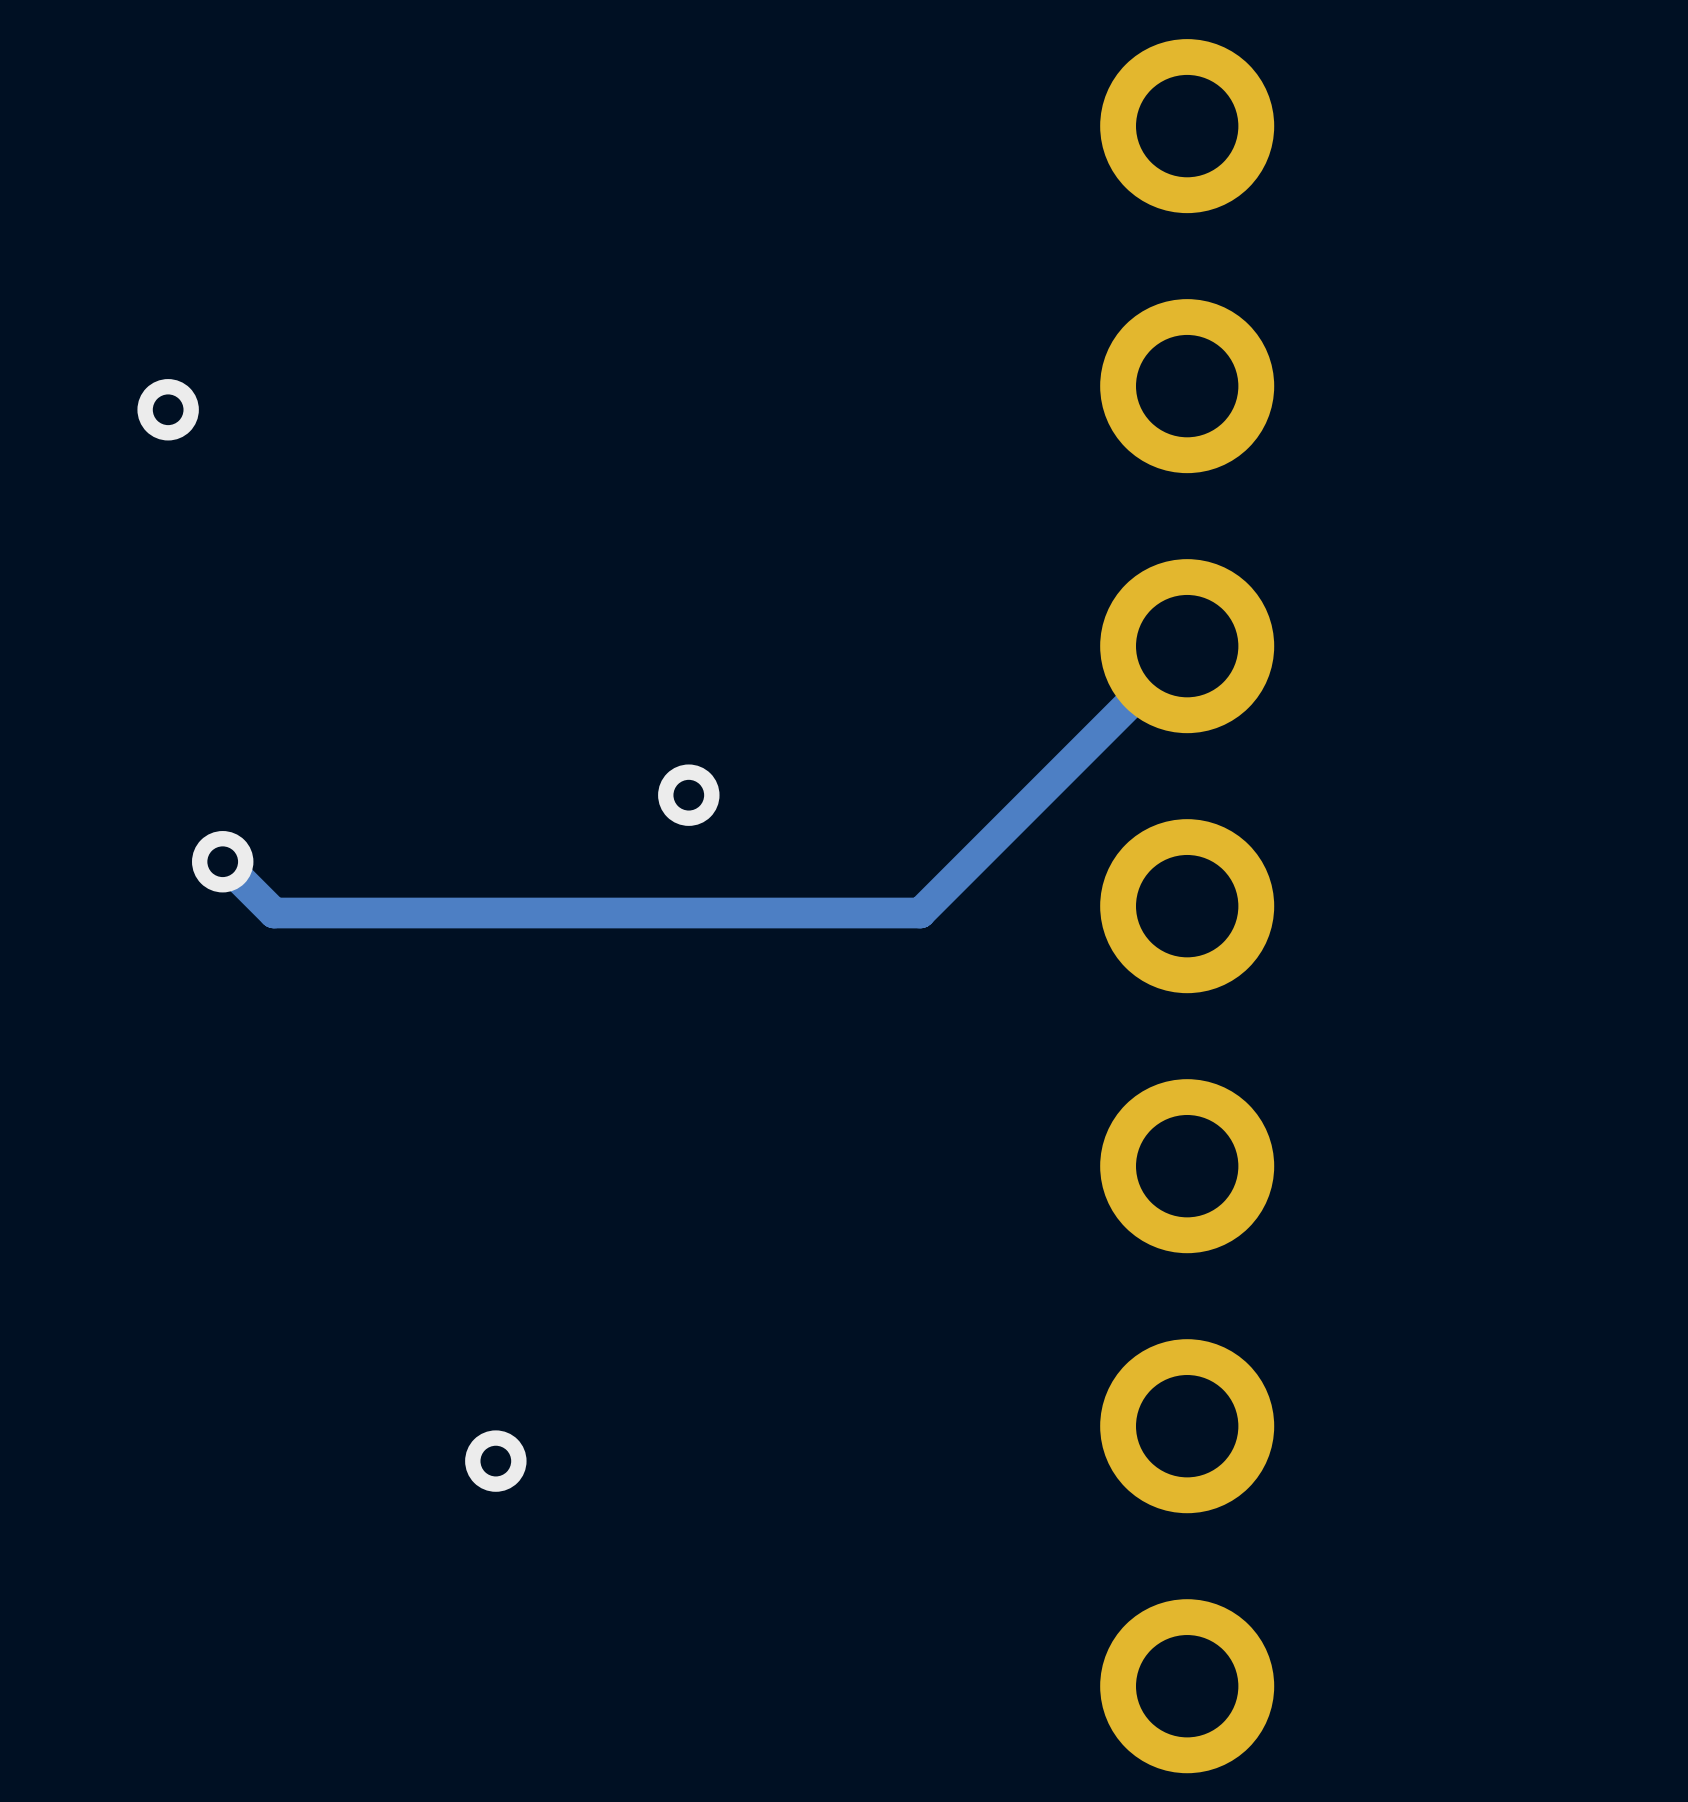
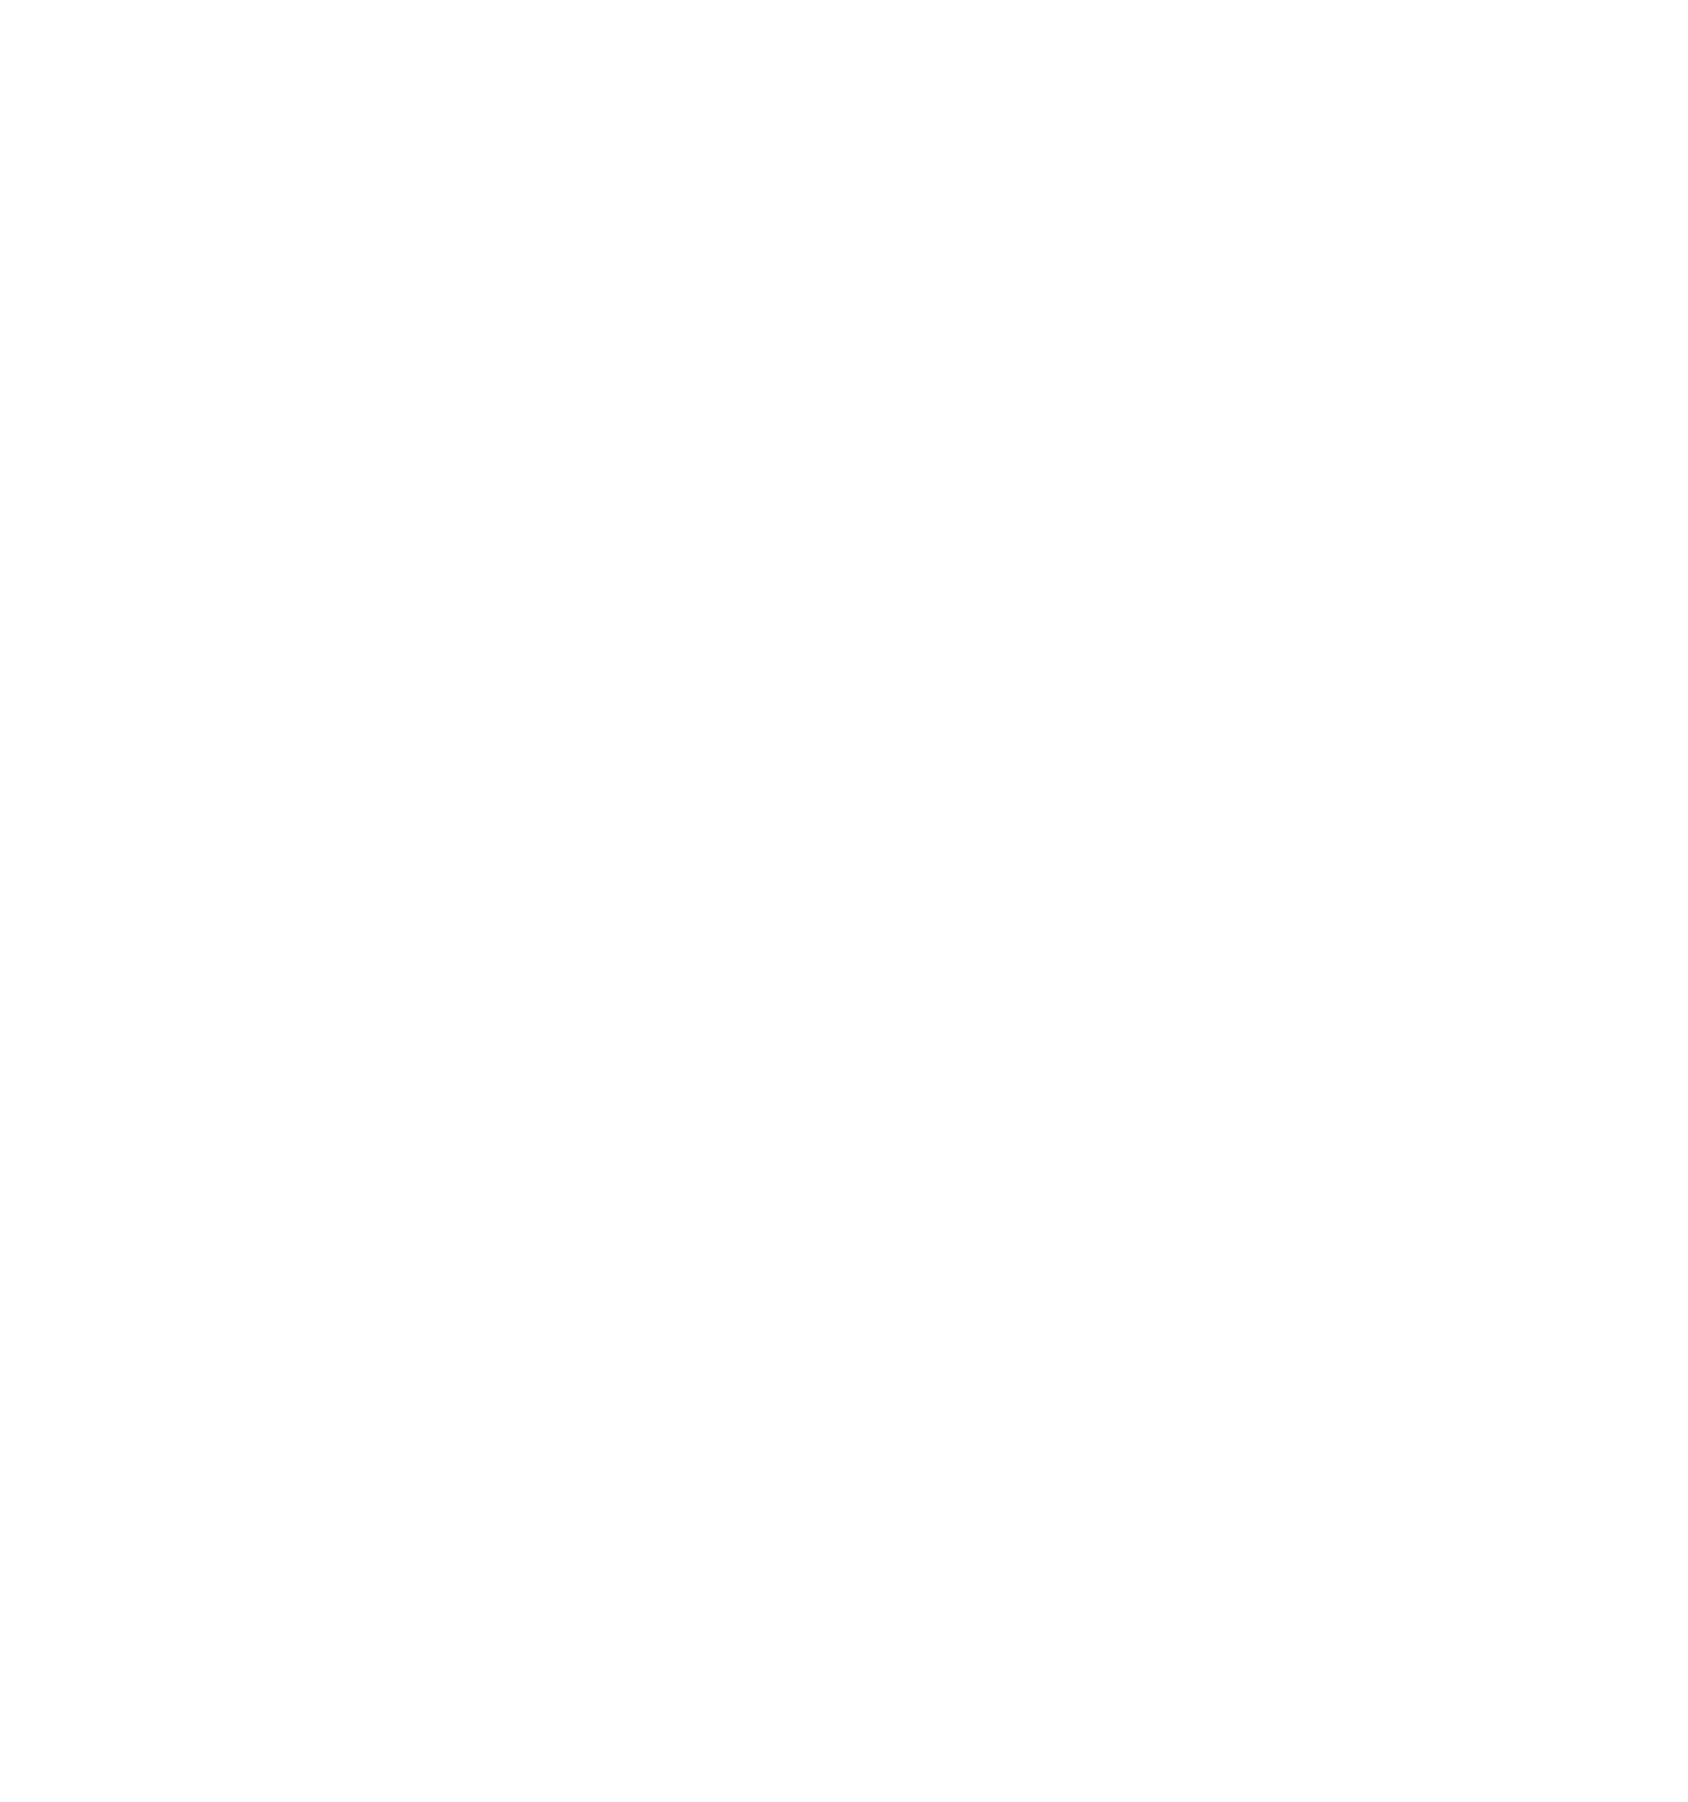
via: (168, 409) -> none
track: (1187, 646) (920, 913) (274, 913) (222, 861) -> none
via: (688, 795) -> none
via: (222, 861) -> none
part: (1187, 906) -> none
via: (495, 1461) -> none

